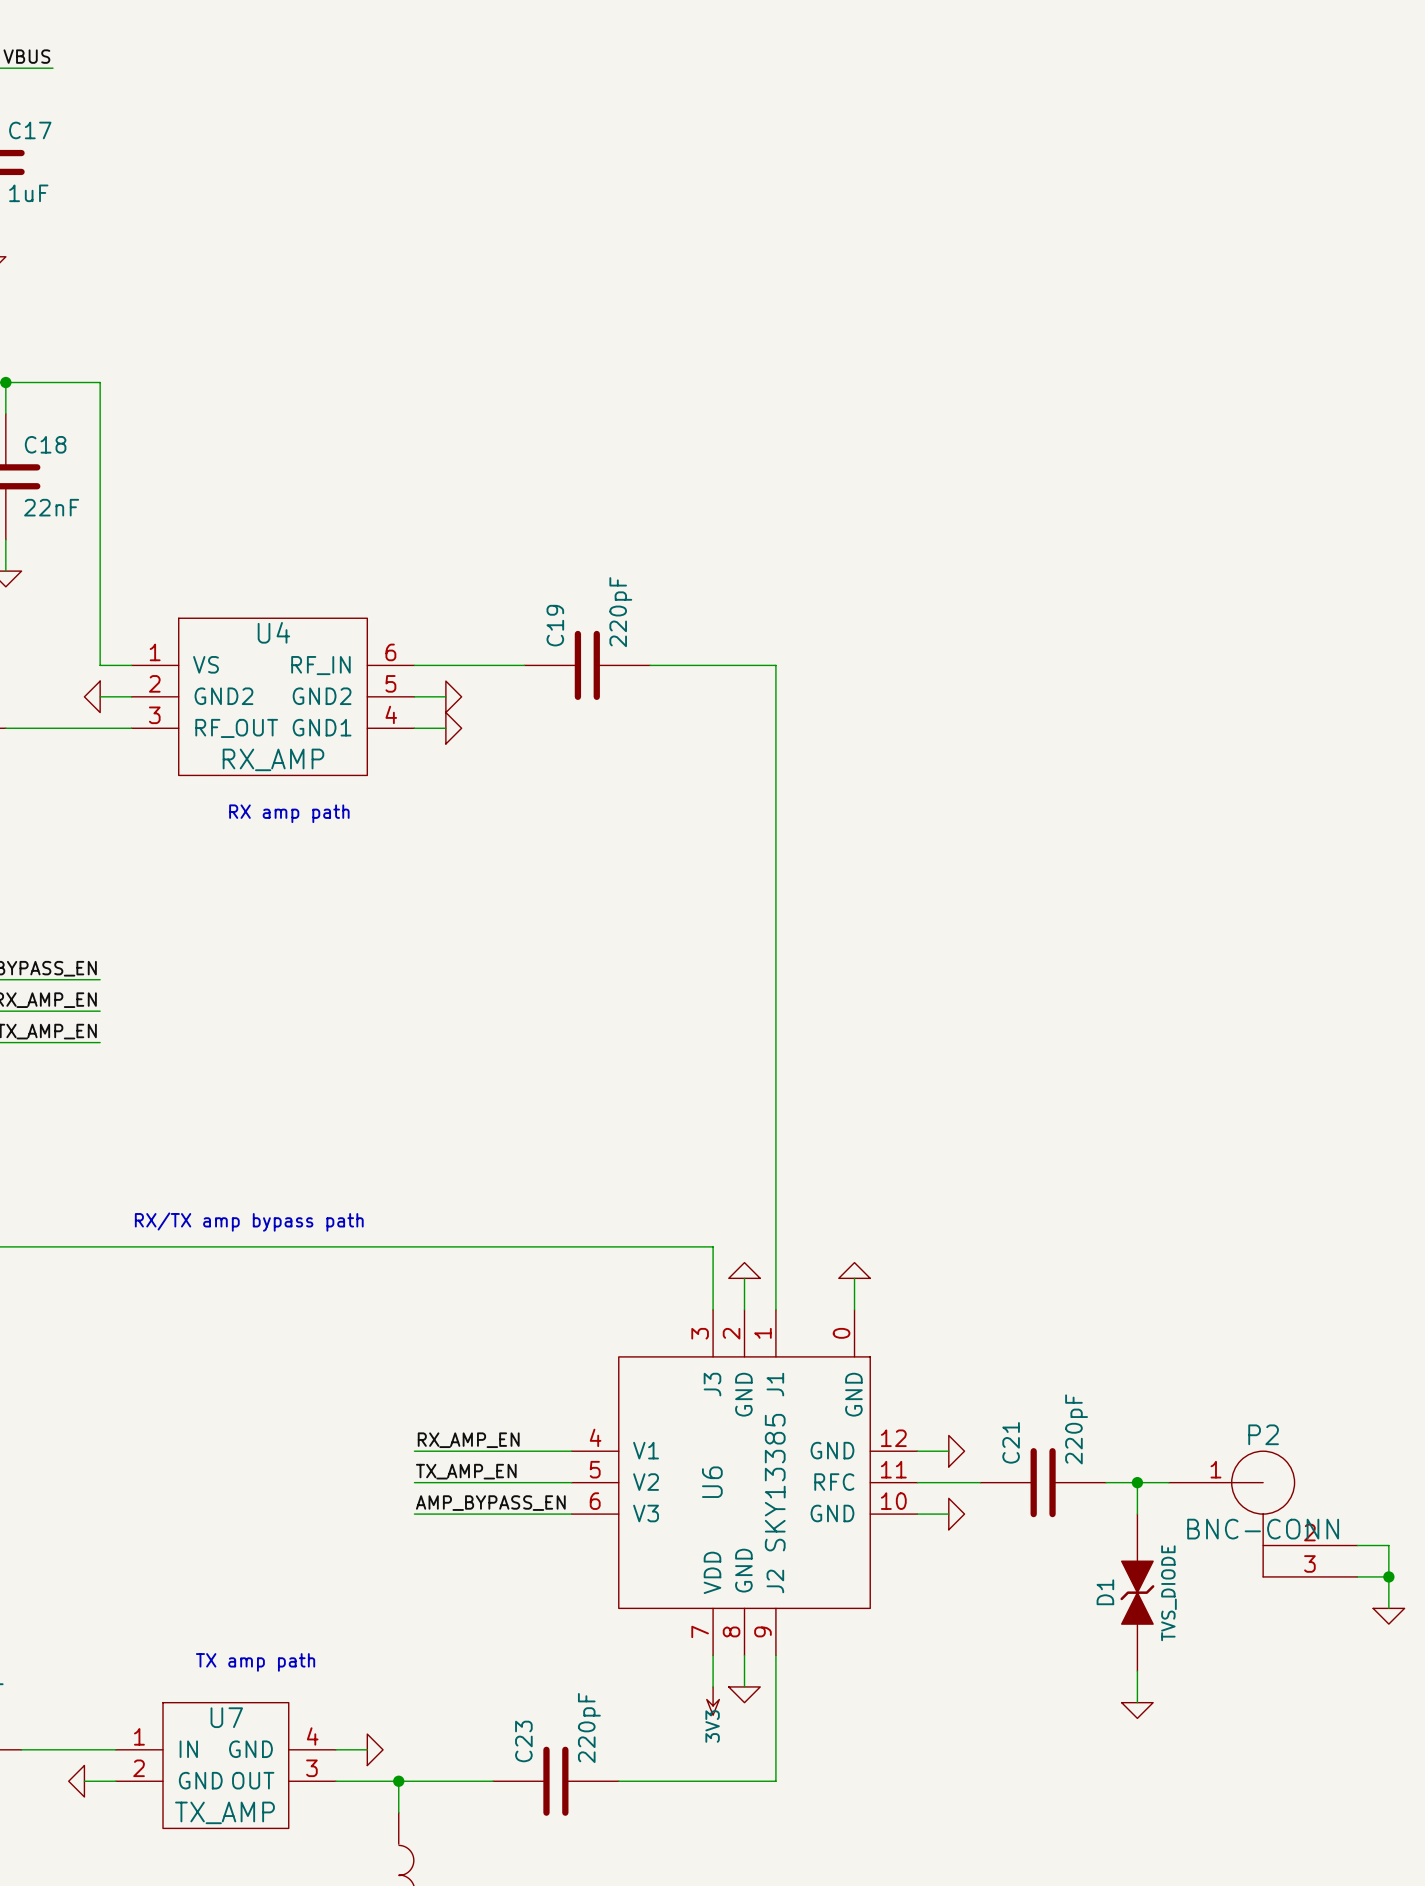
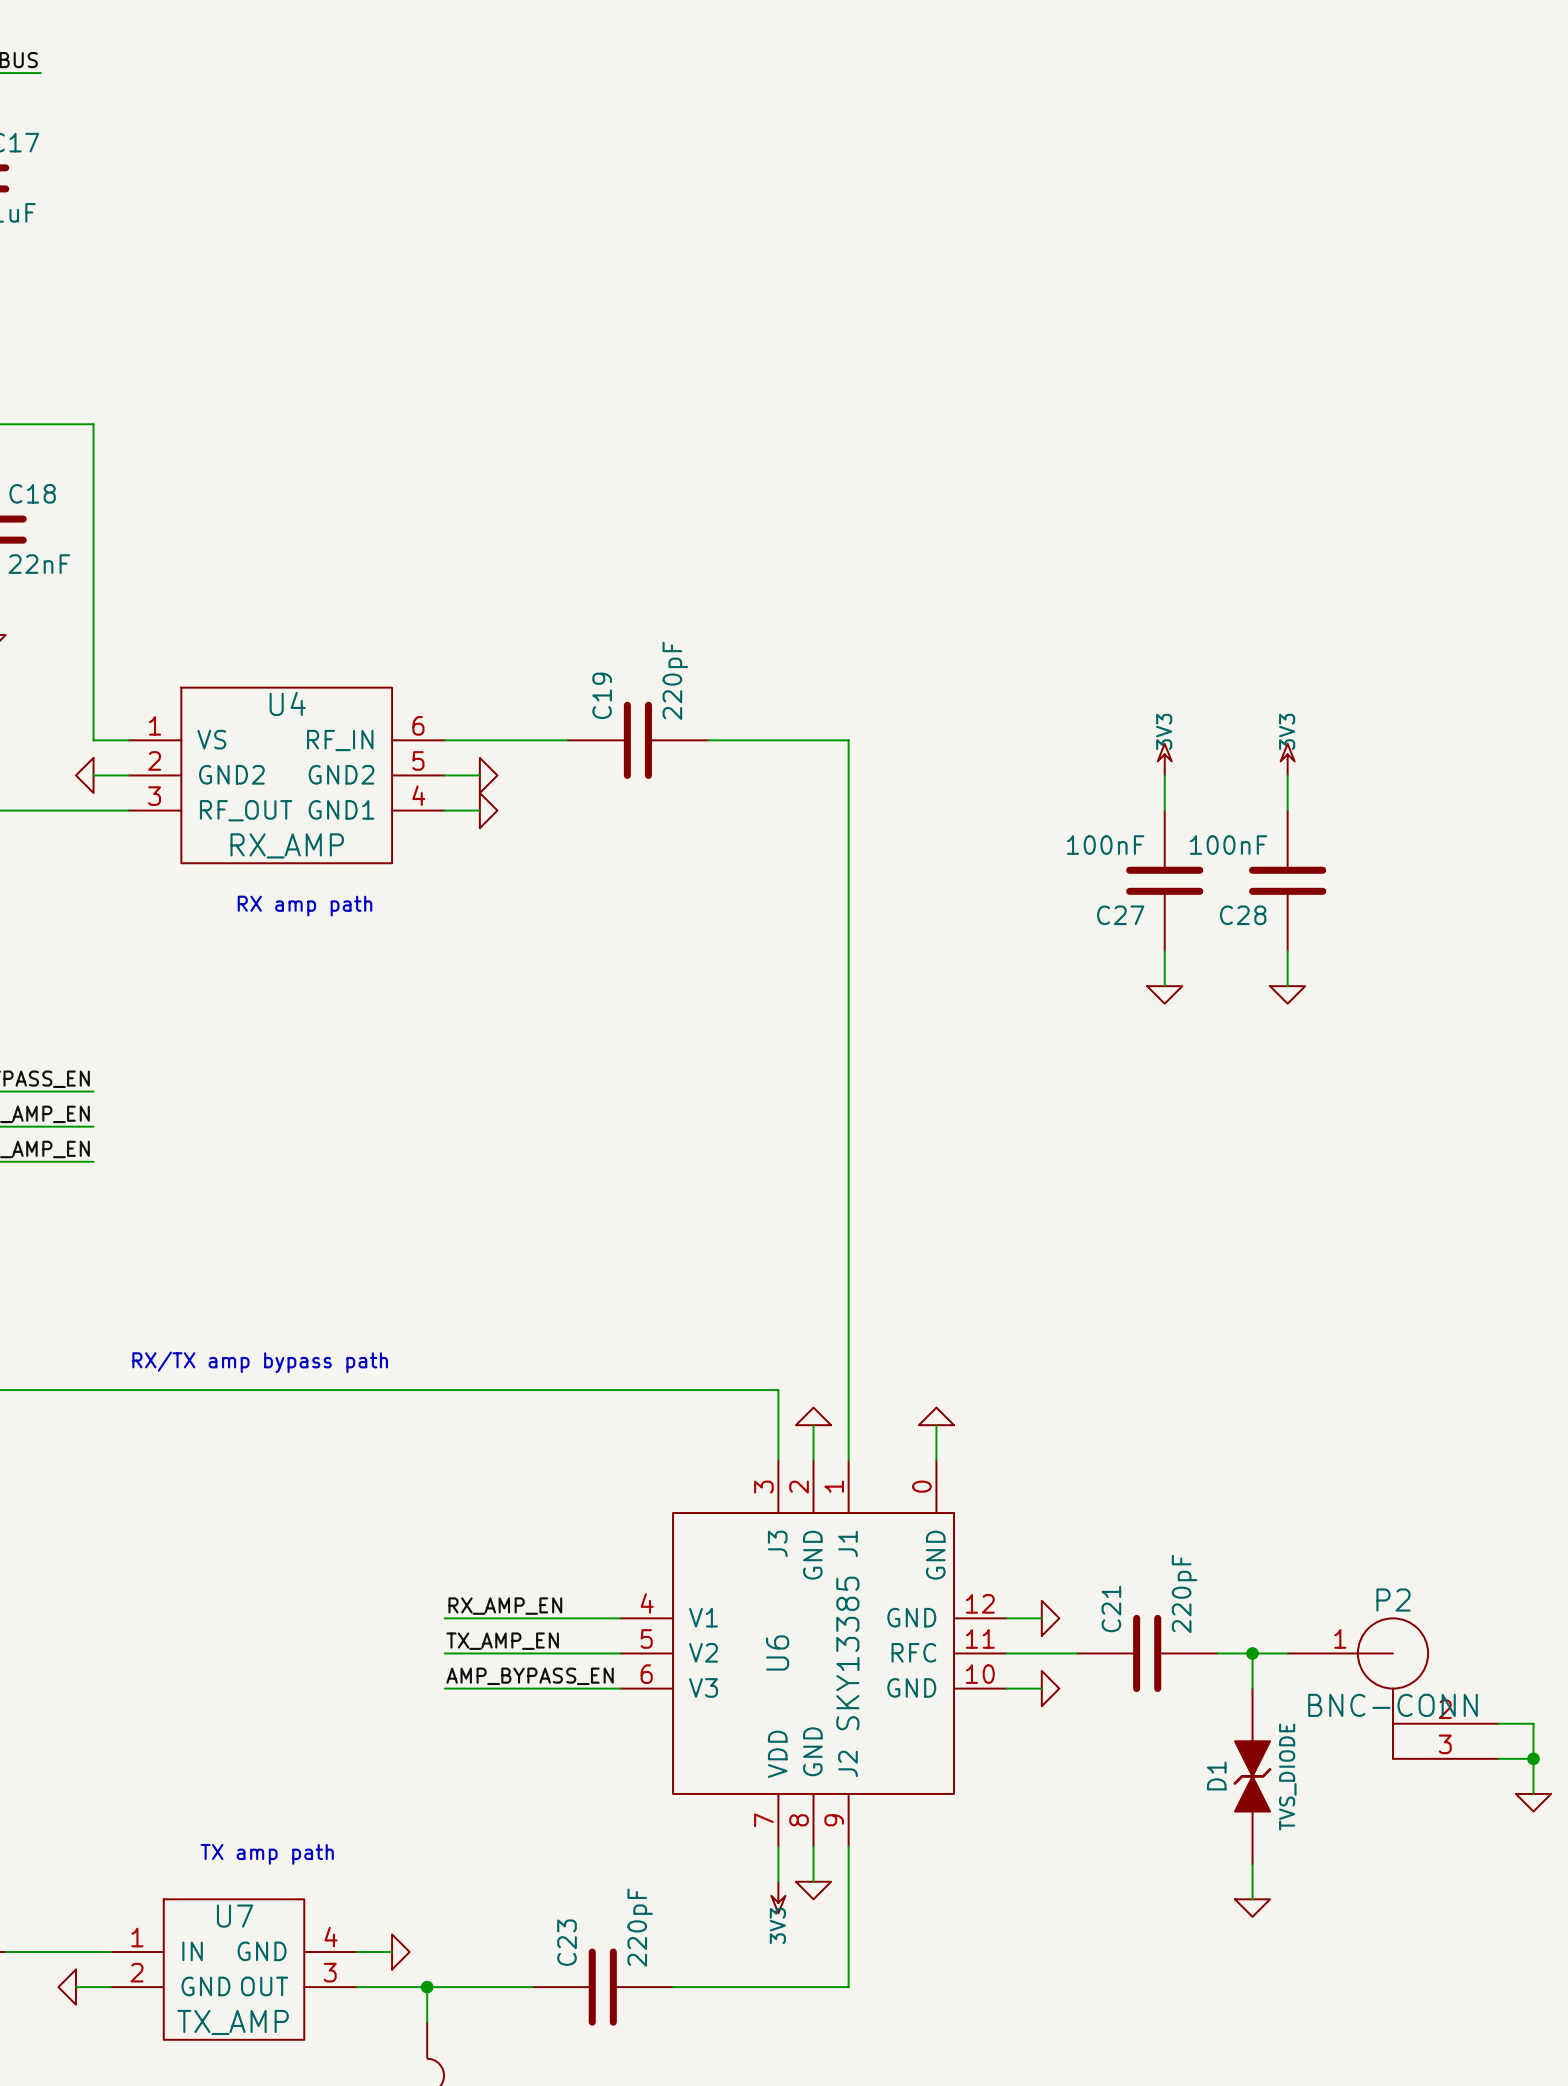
power symbol: none -> 3V3 (1164, 759)
power symbol: none -> 3V3 (1287, 759)
wire: none -> (1164, 775) (1164, 810)
wire: none -> (1287, 775) (1287, 810)
C27: none -> 100nF (1164, 880)
C28: none -> 100nF (1287, 880)
wire: none -> (1164, 951) (1164, 986)
wire: none -> (1287, 951) (1287, 986)
power symbol: none -> (1164, 994)
power symbol: none -> (1287, 994)

